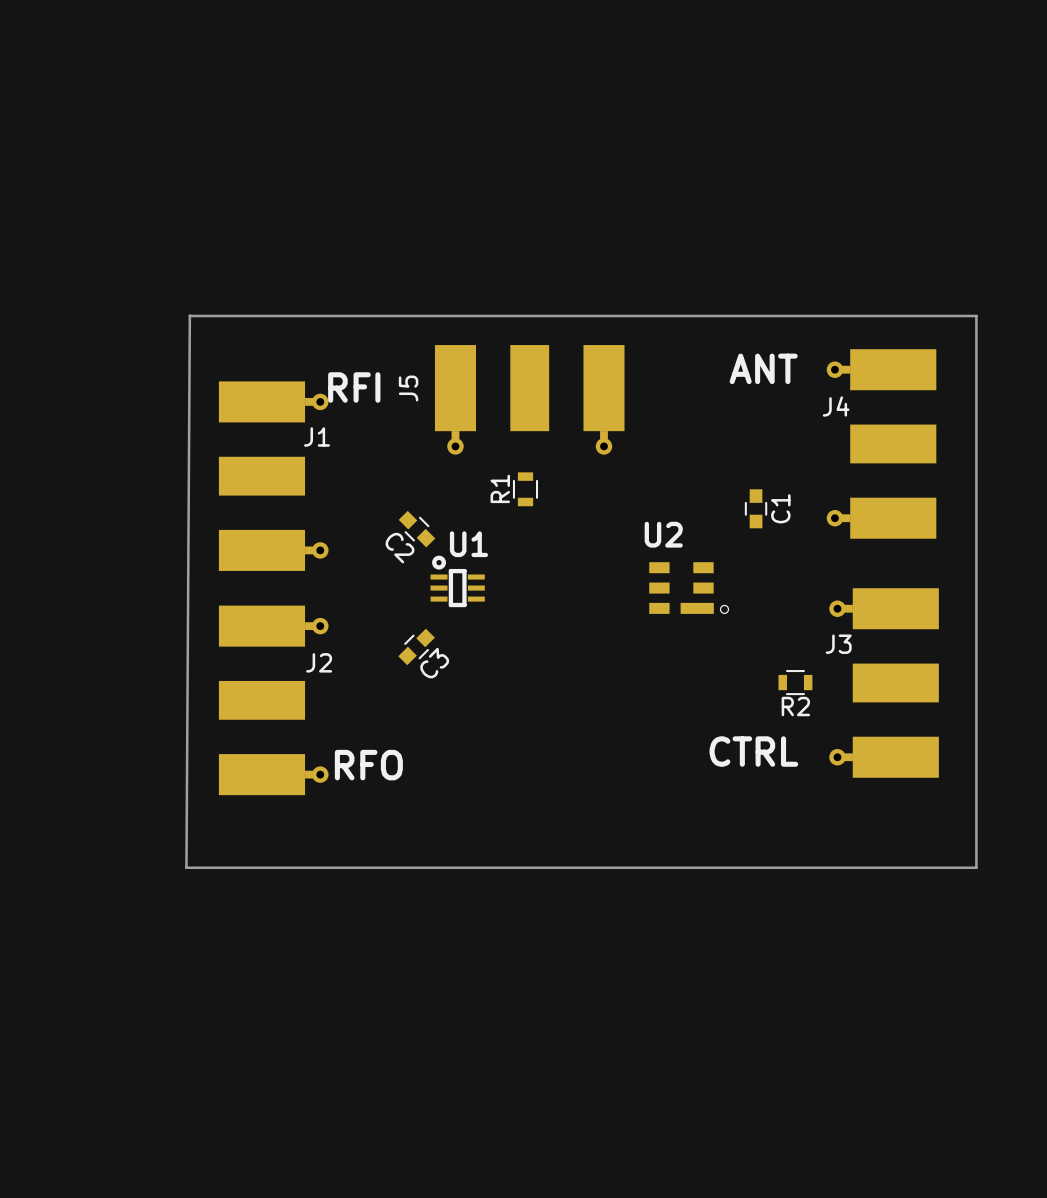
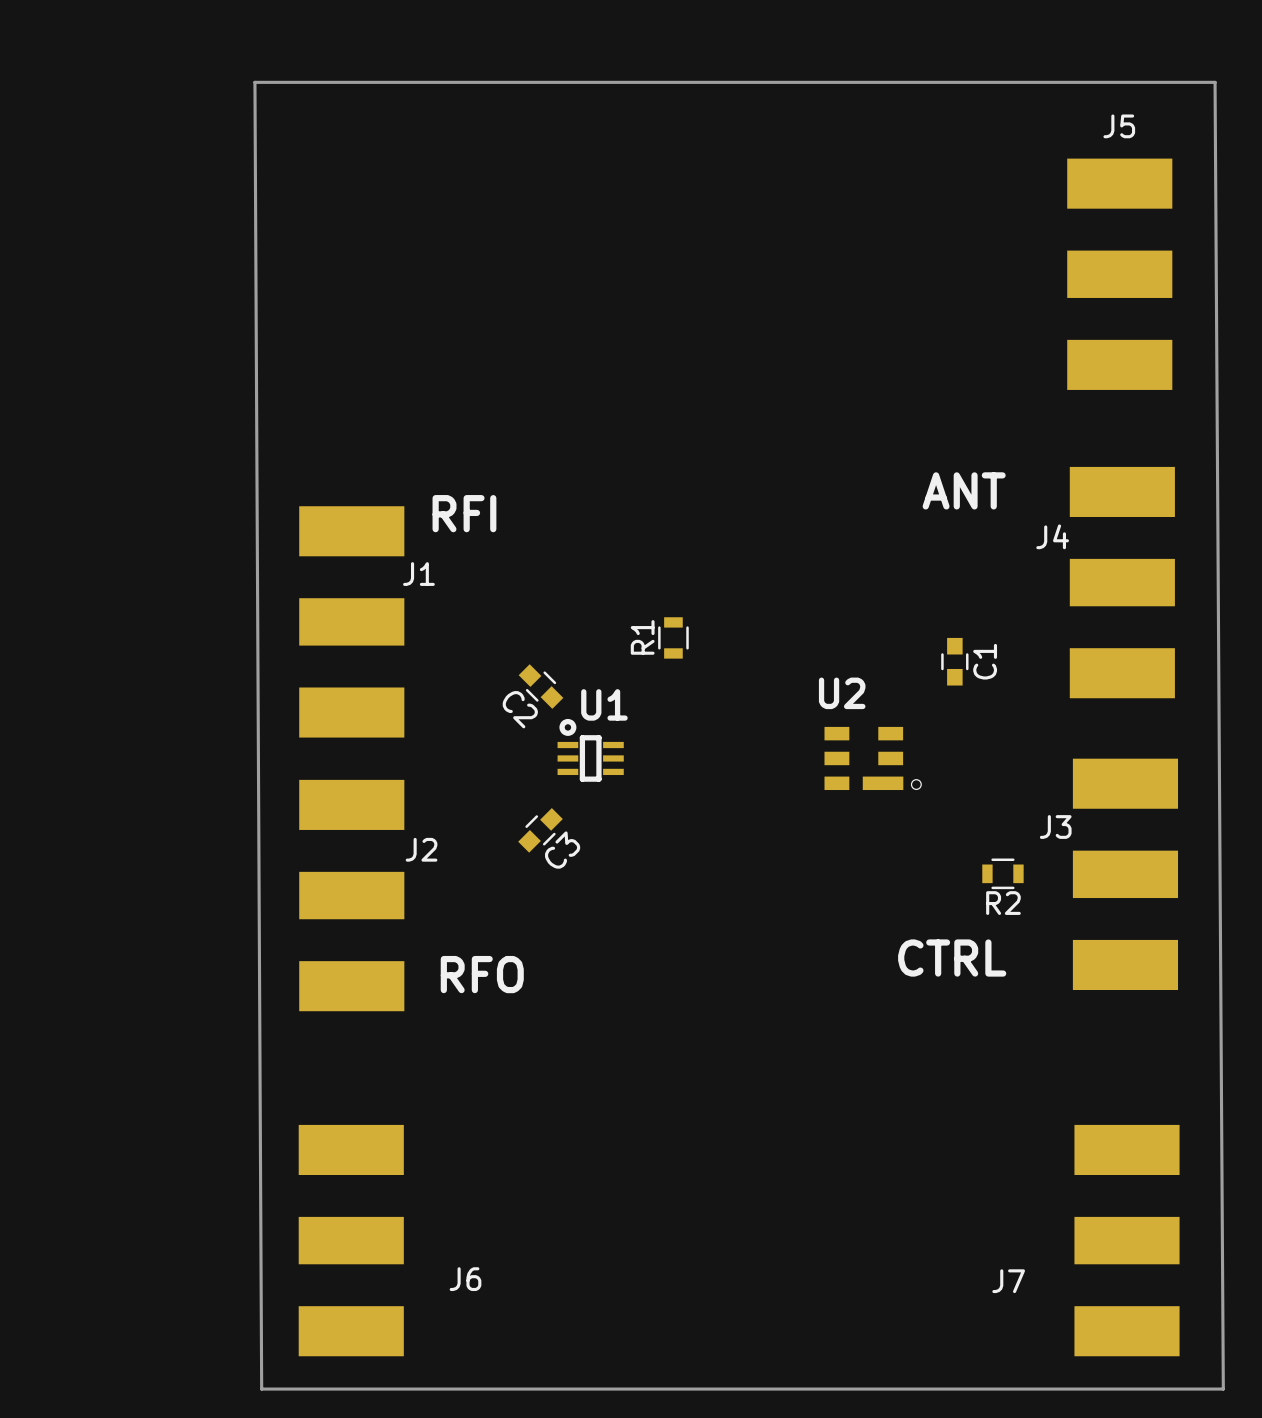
board edge: none -> (254, 82) (261, 1389) (1223, 1389) (1215, 82) (254, 82)
board edge: (189, 315) (186, 867) (976, 867) (976, 315) (189, 315) -> none
J5 footprint: [434, 345, 625, 455] -> [1067, 158, 1173, 390]
J4 footprint: [826, 349, 937, 539] -> [1069, 466, 1175, 699]
J1 footprint: [218, 381, 329, 571] -> [299, 506, 405, 738]
J5 name position: J5 (408, 388) -> J5 (1119, 126)
J3 footprint: [829, 588, 939, 778] -> [1072, 758, 1179, 991]
J2 footprint: [218, 605, 329, 796] -> [299, 779, 405, 1012]
J6: none -> (351, 1240)
J7: none -> (1127, 1240)

